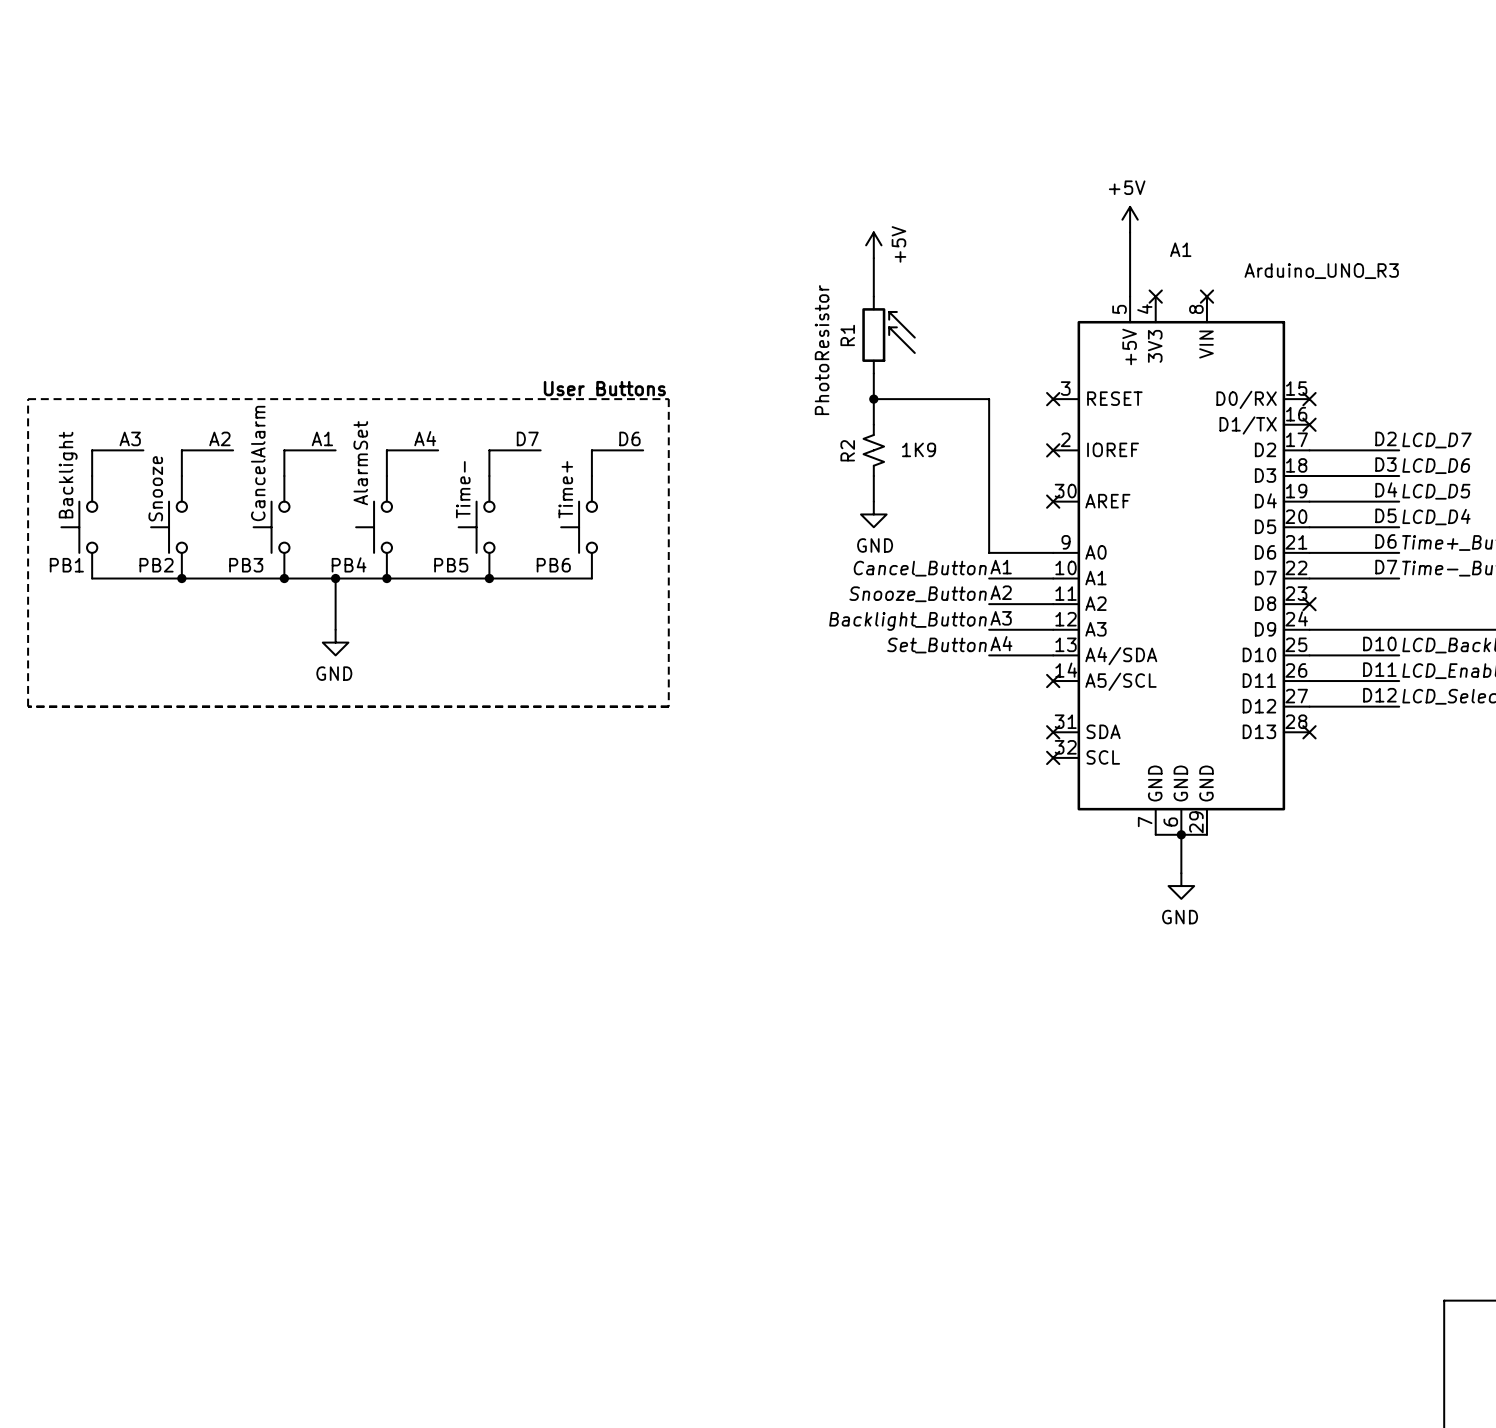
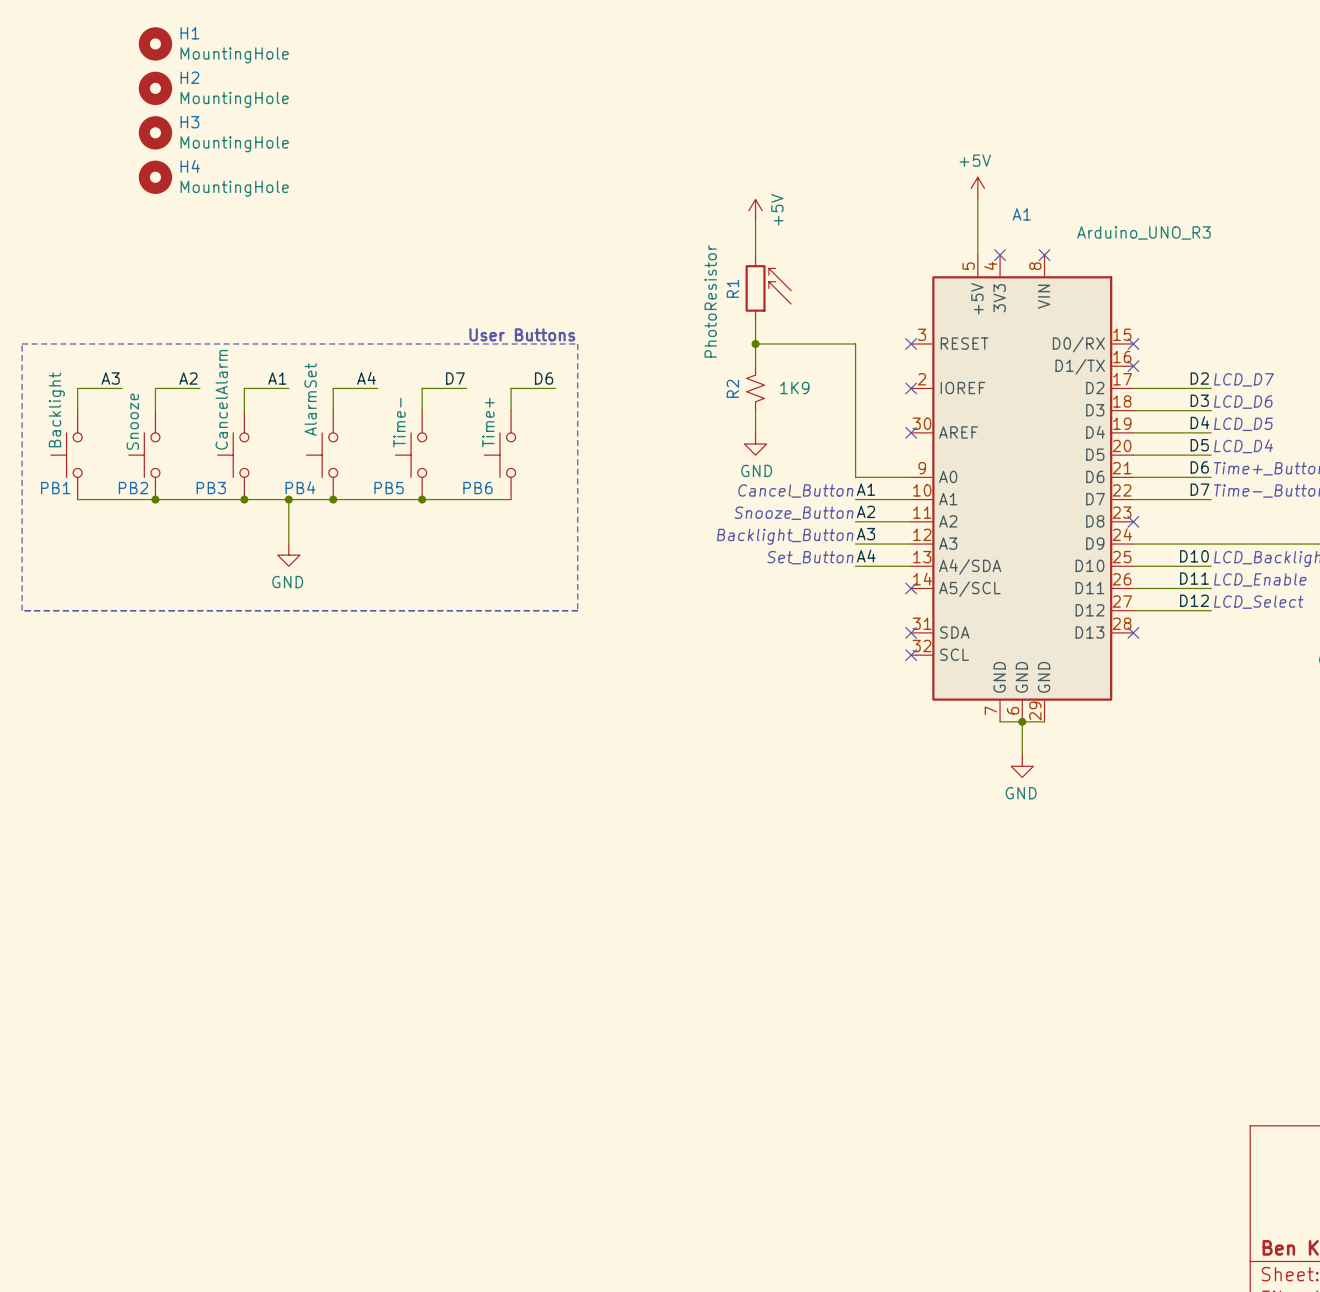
H1: none -> MountingHole (155, 43)
H2: none -> MountingHole (155, 88)
H3: none -> MountingHole (155, 132)
H4: none -> MountingHole (155, 177)

